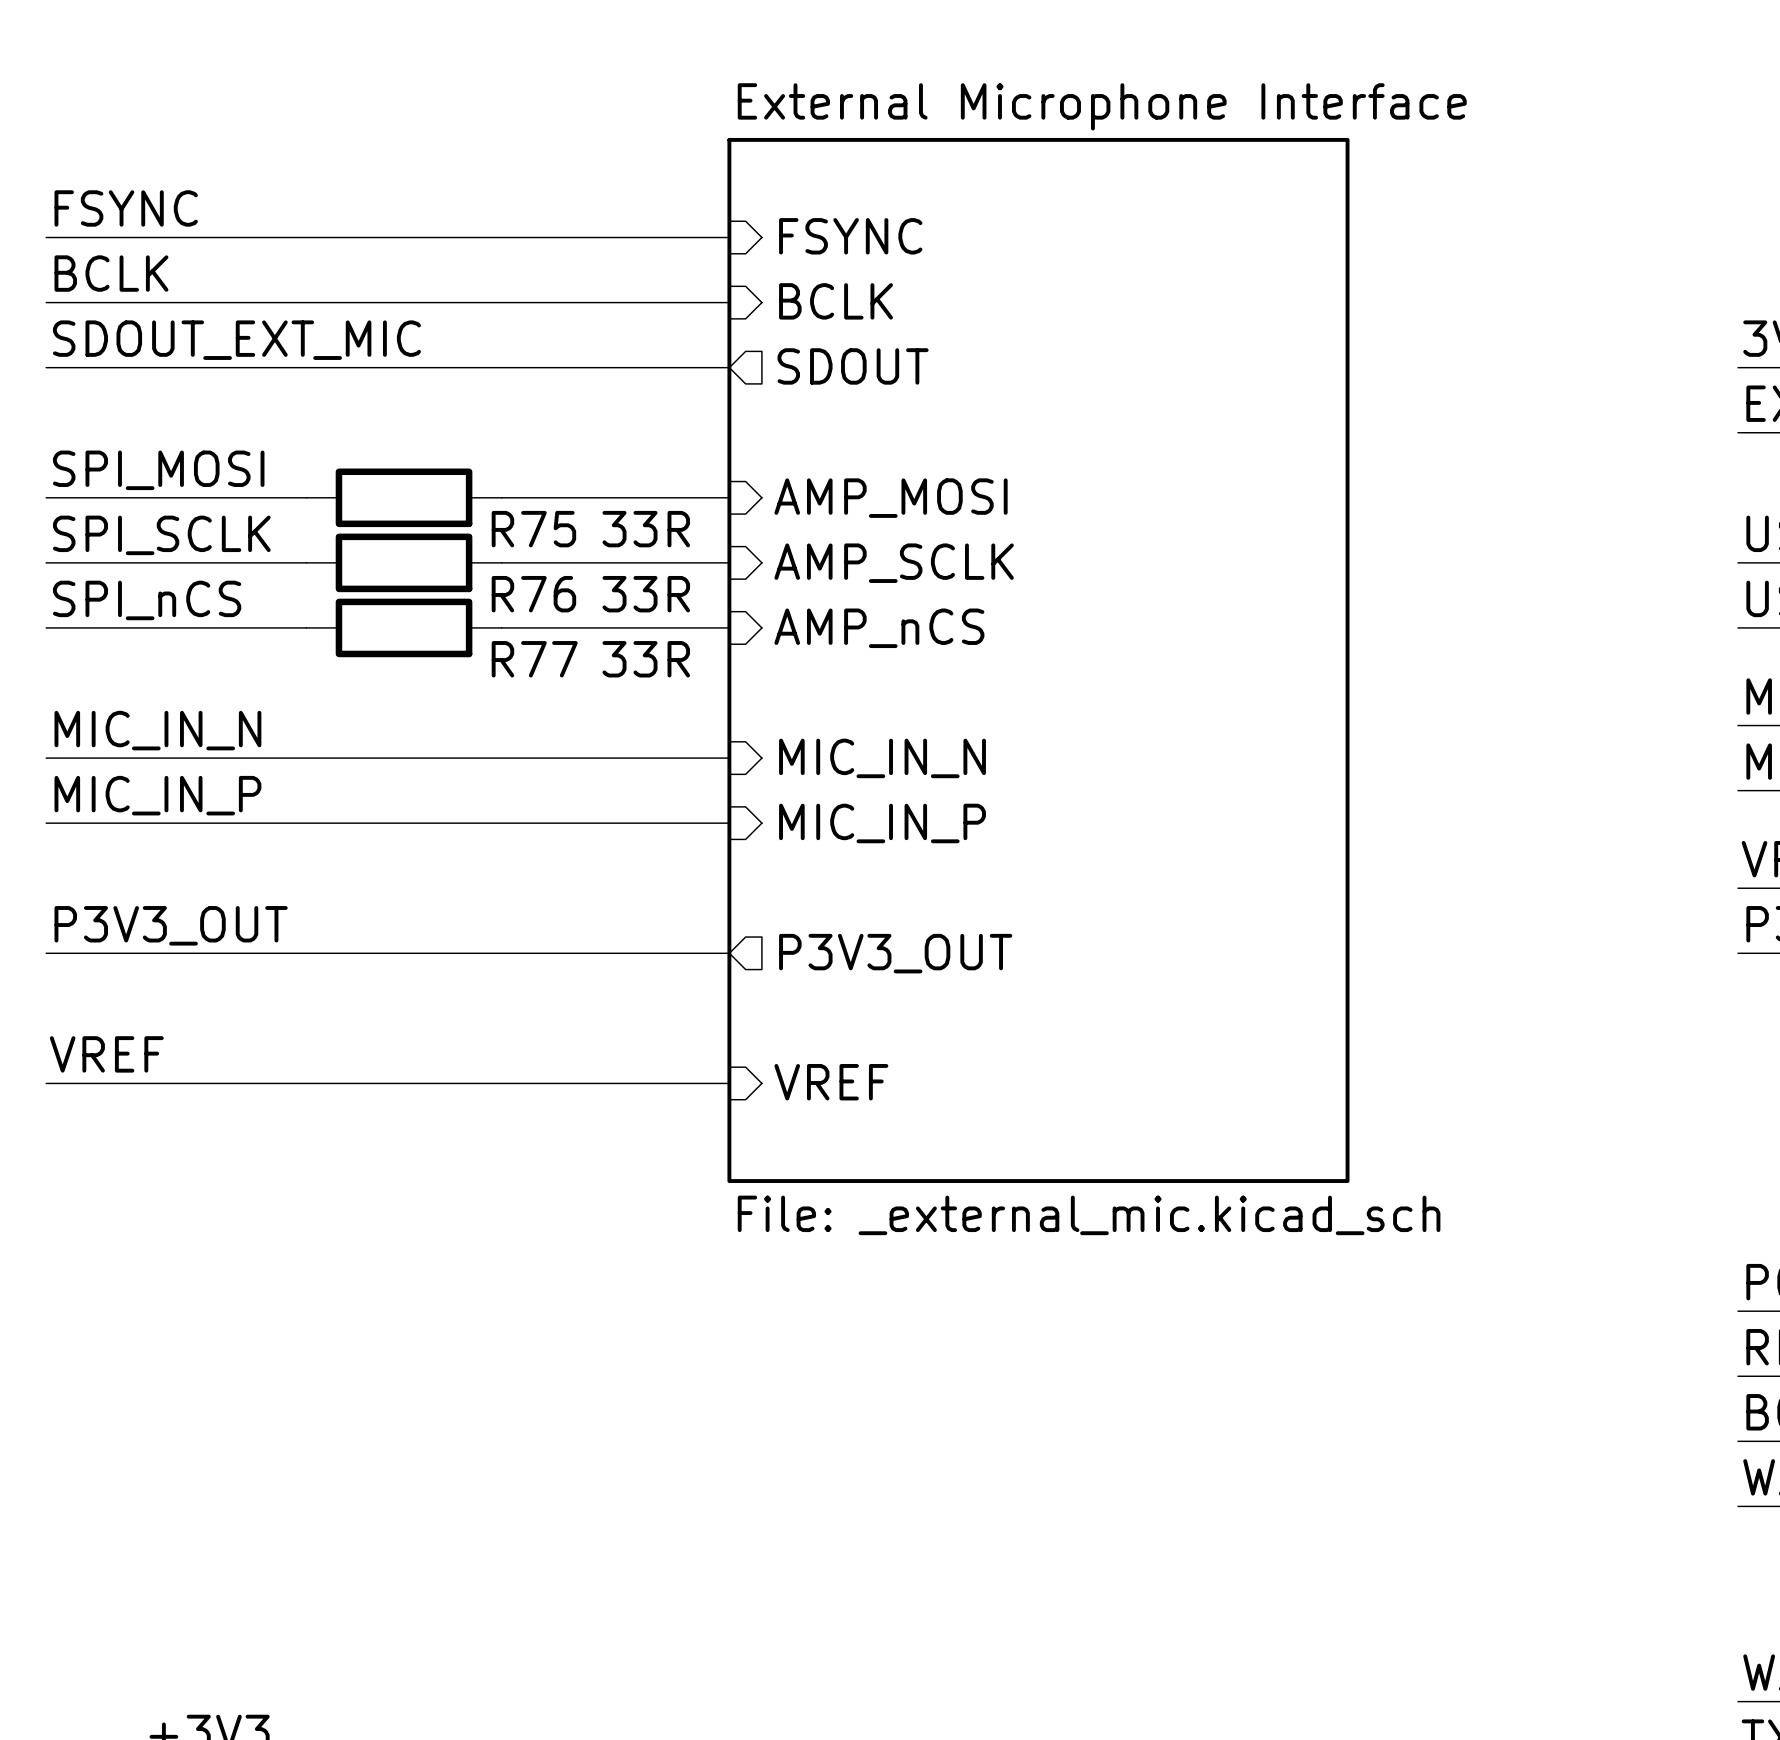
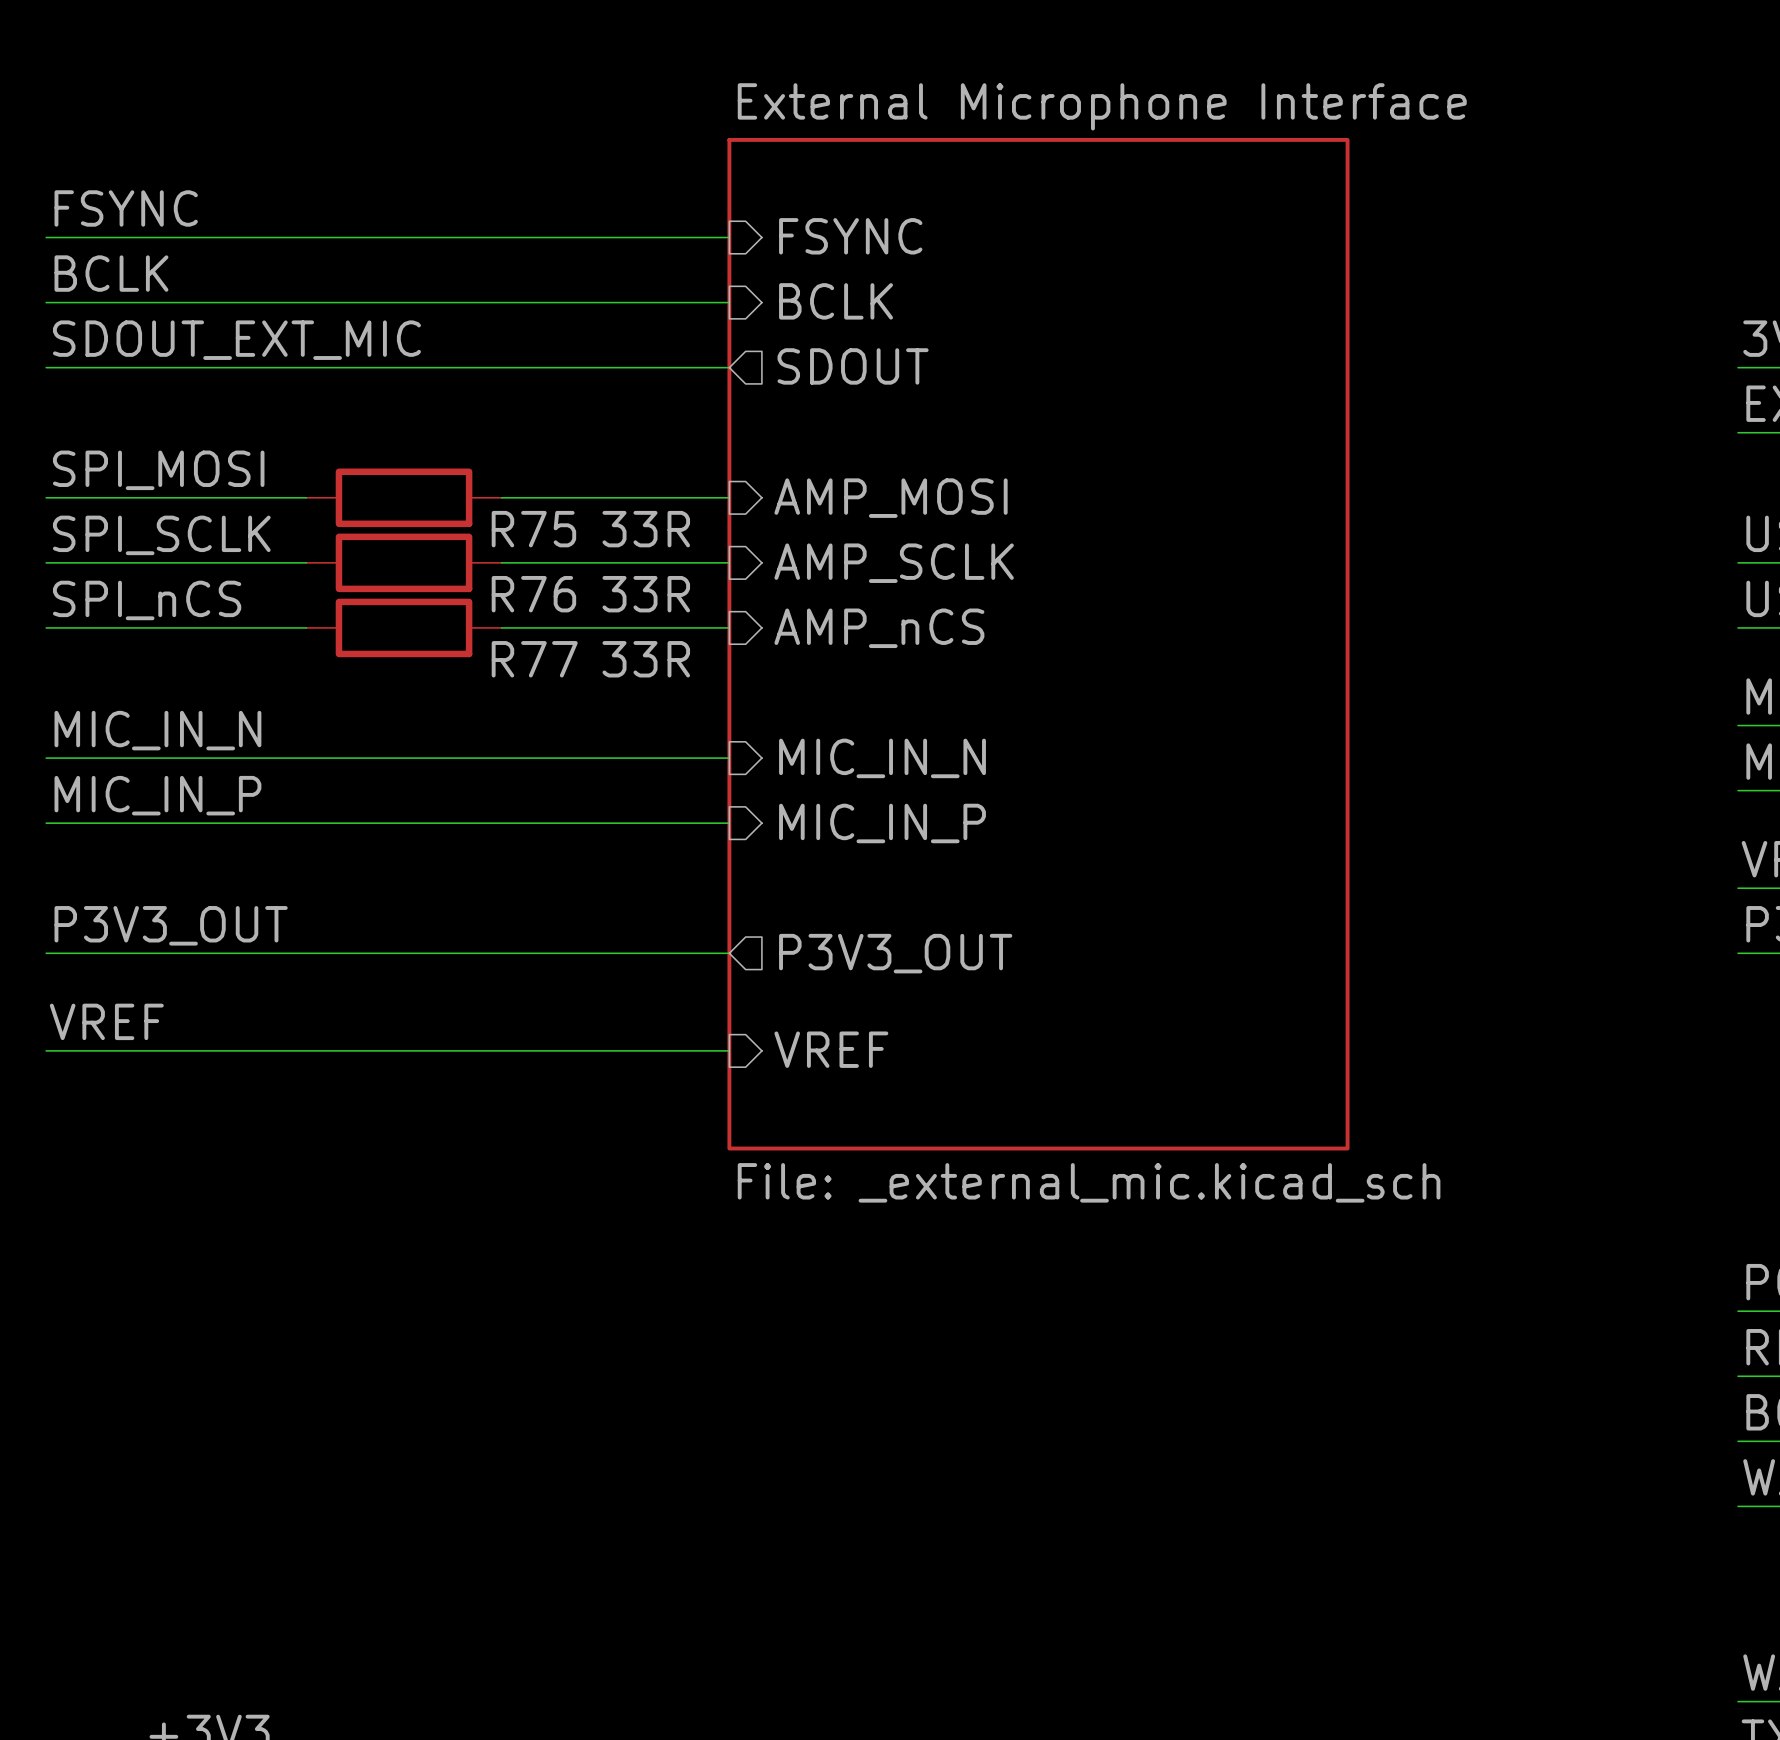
sheet External Microphone Interface shape: [727, 137, 1350, 1184] -> [727, 137, 1350, 1151]
label position: VREF (106, 1054) -> VREF (106, 1021)
sheet pin position: VREF (831, 1082) -> VREF (831, 1049)
wire: (46, 1083) (729, 1083) -> (46, 1050) (729, 1050)

